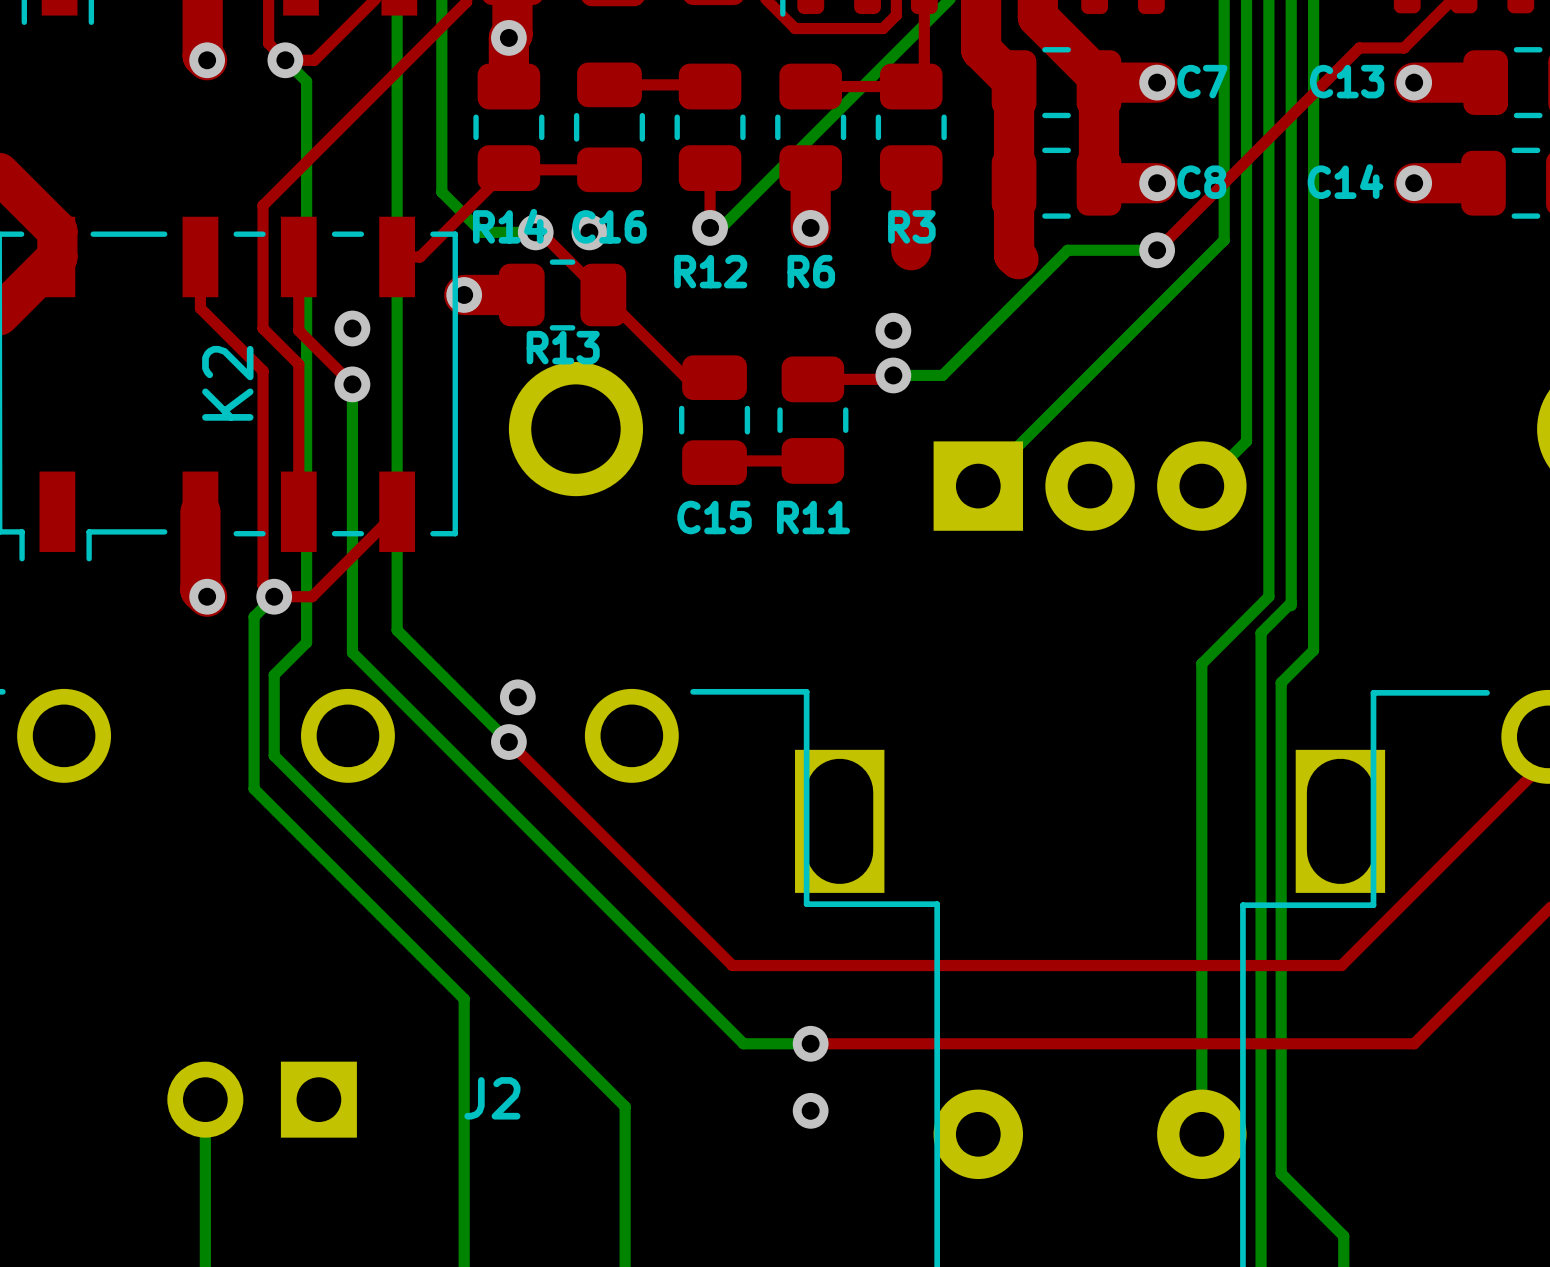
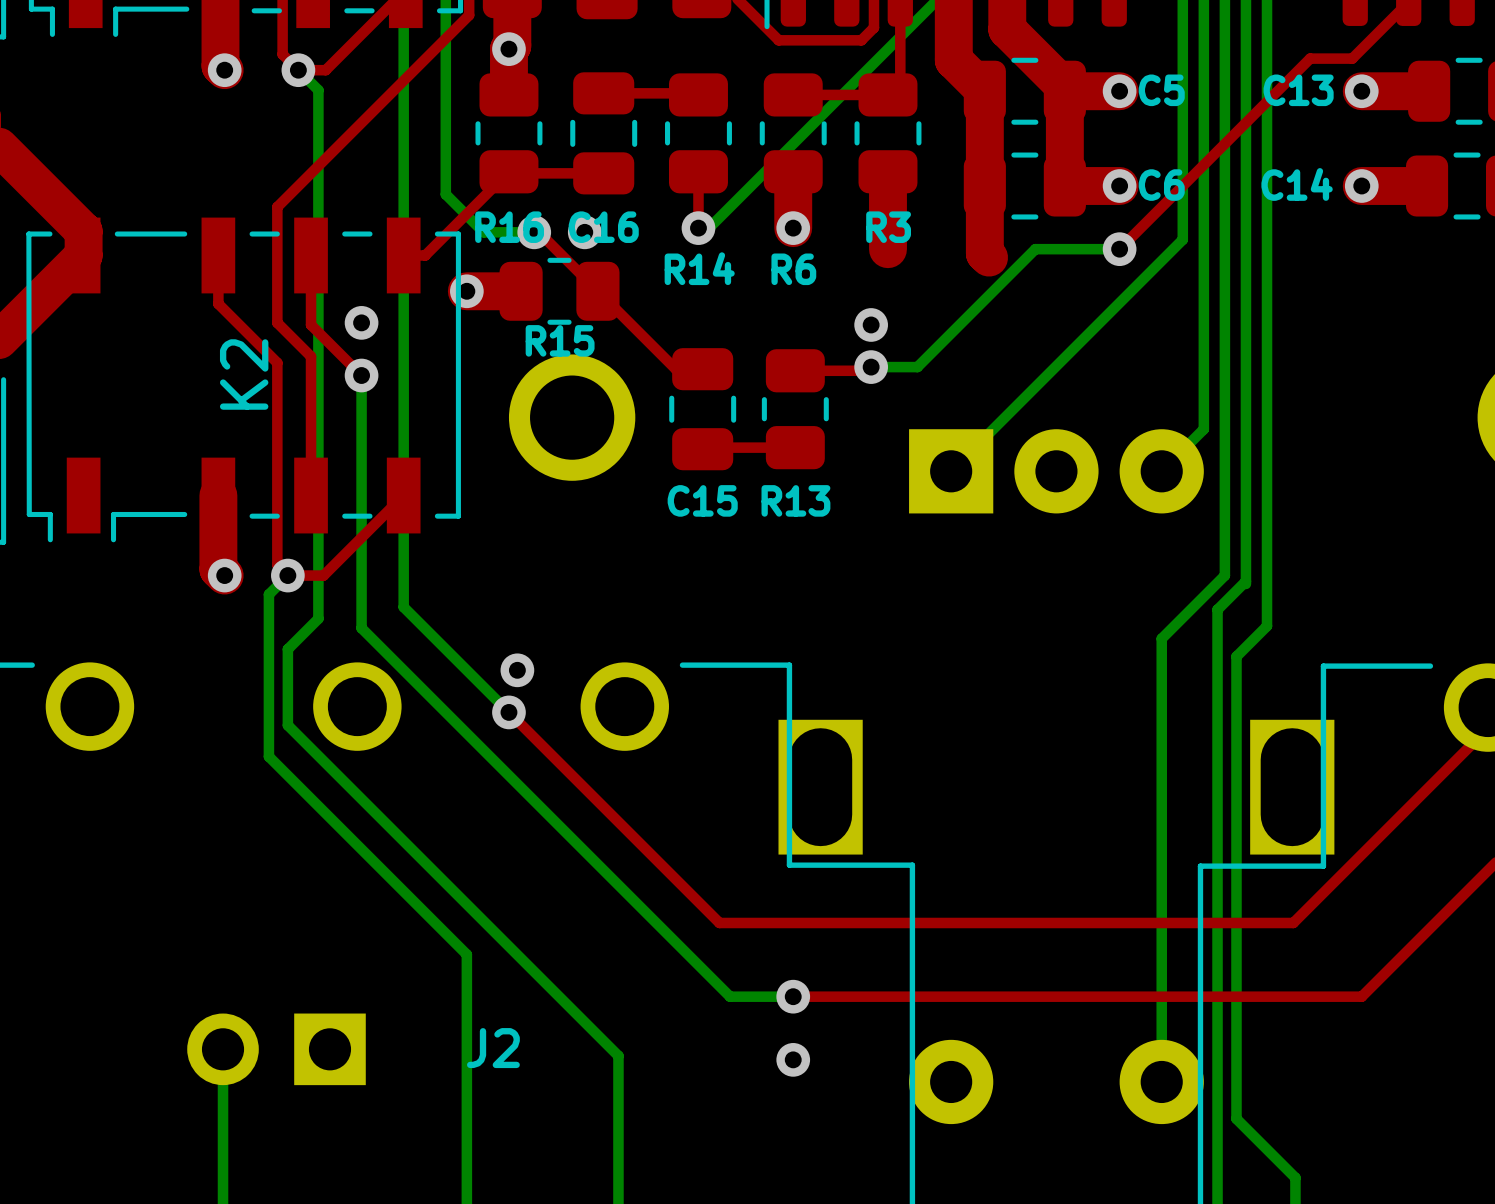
C7 name: C7 (1202, 81) -> C5 (1161, 90)
C8 name: C8 (1201, 182) -> C6 (1161, 185)
R14 name: R14 (510, 226) -> R16 (509, 227)
R12 name: R12 (710, 271) -> R14 (699, 268)
R13 name: R13 (563, 347) -> R15 (560, 340)
R11 name: R11 (813, 517) -> R13 (795, 500)

